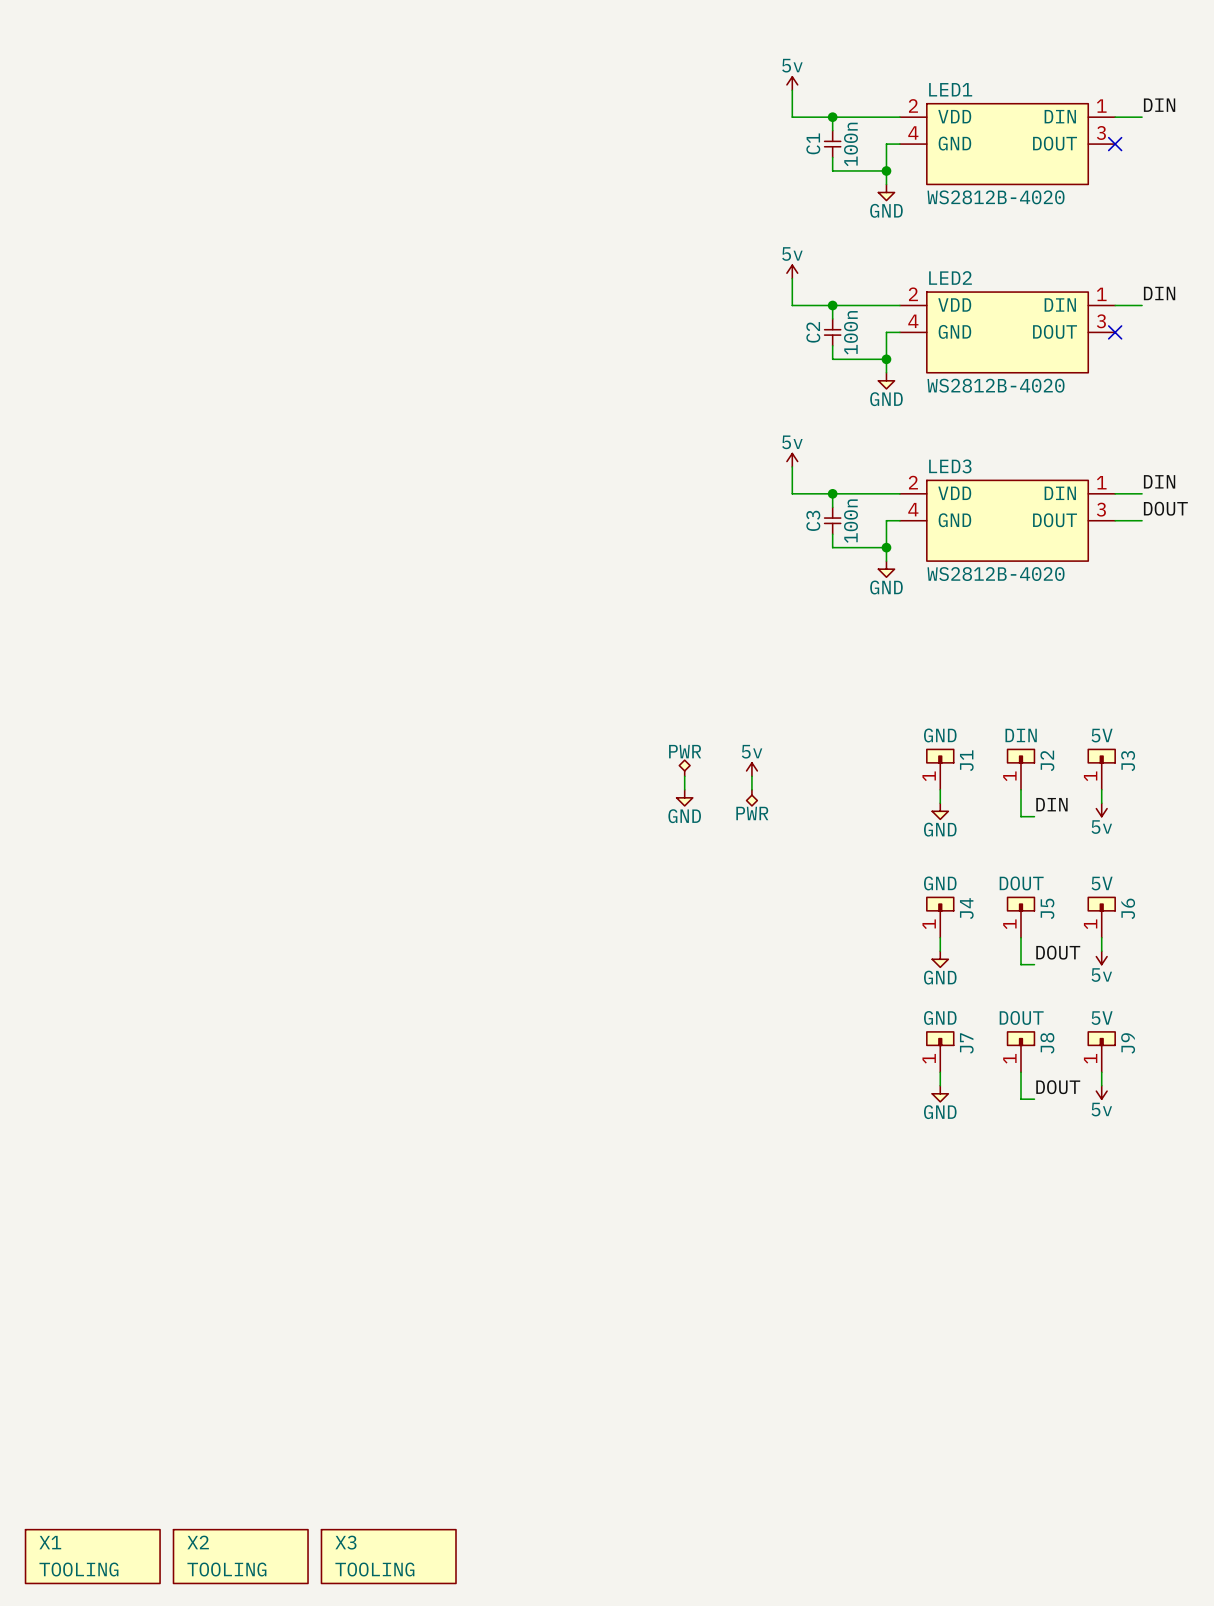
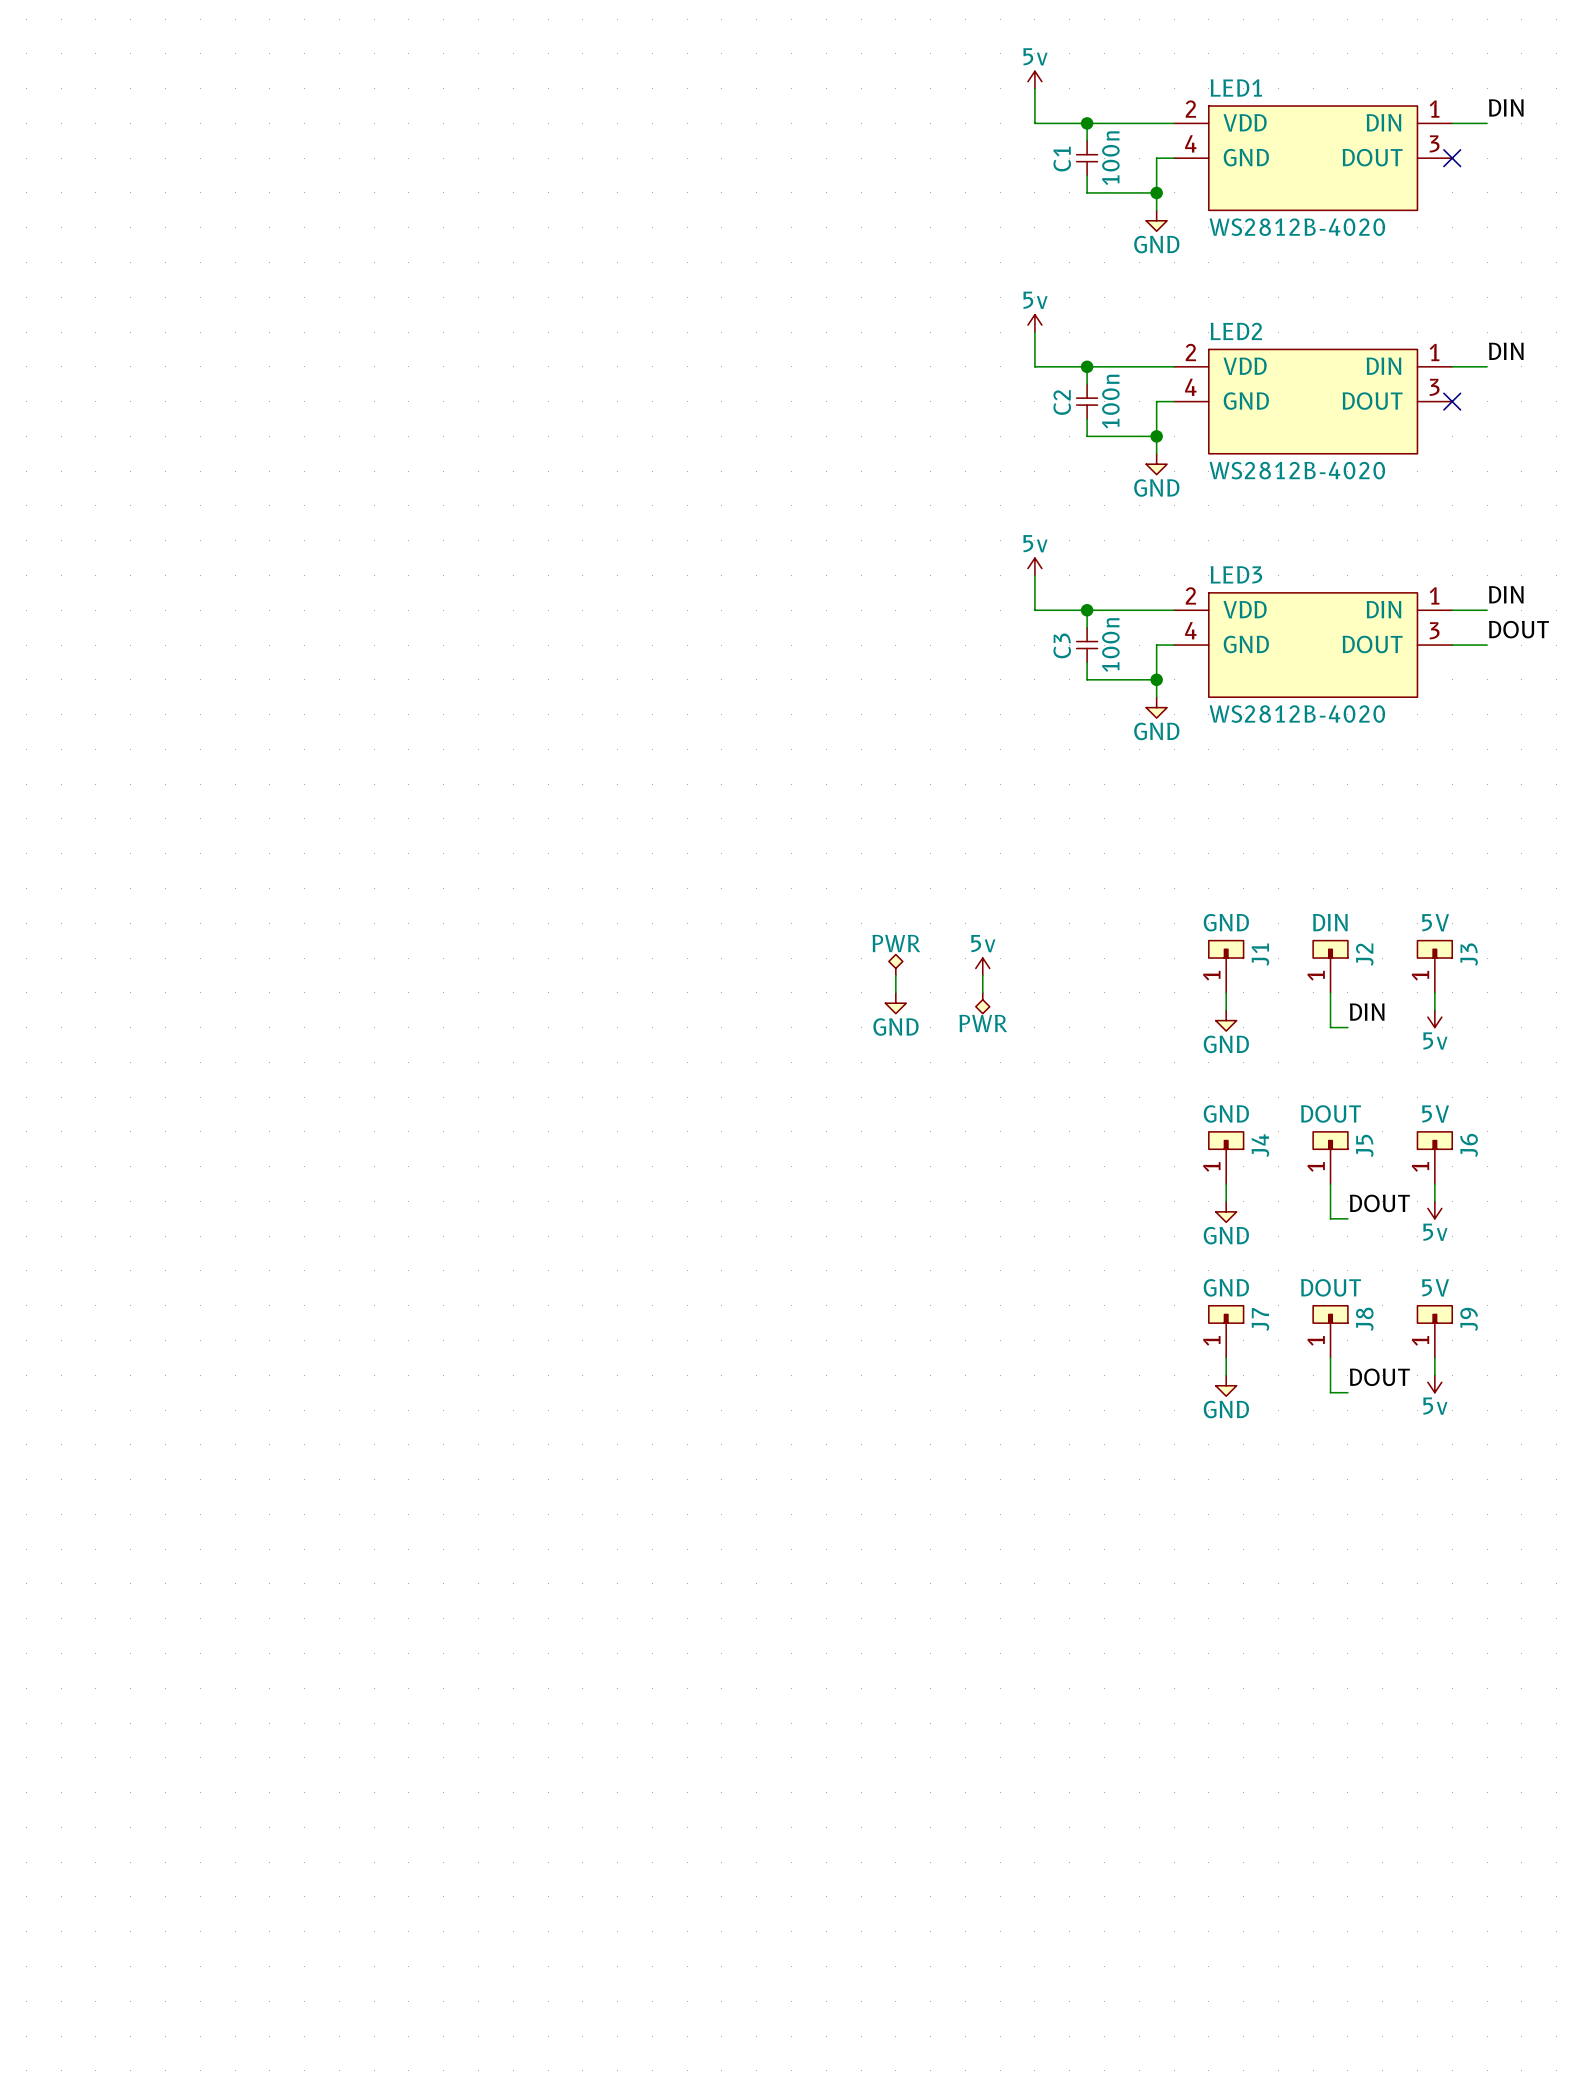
X1: TOOLING (92, 1556) -> none
X2: TOOLING (240, 1556) -> none
X3: TOOLING (388, 1556) -> none

